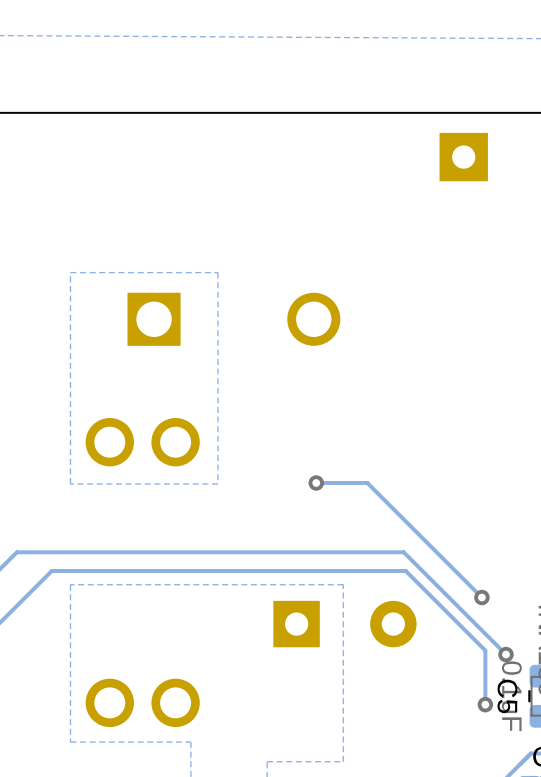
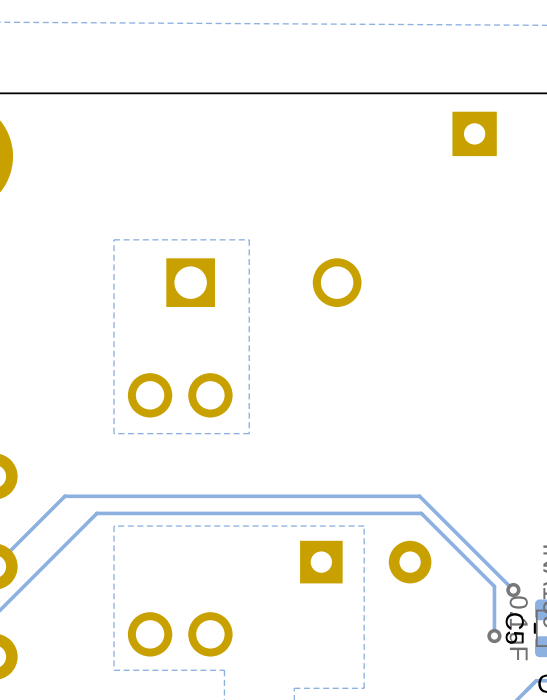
track: (316, 482) (367, 482) (481, 597) -> none
via: (316, 482) -> none
via: (481, 597) -> none

